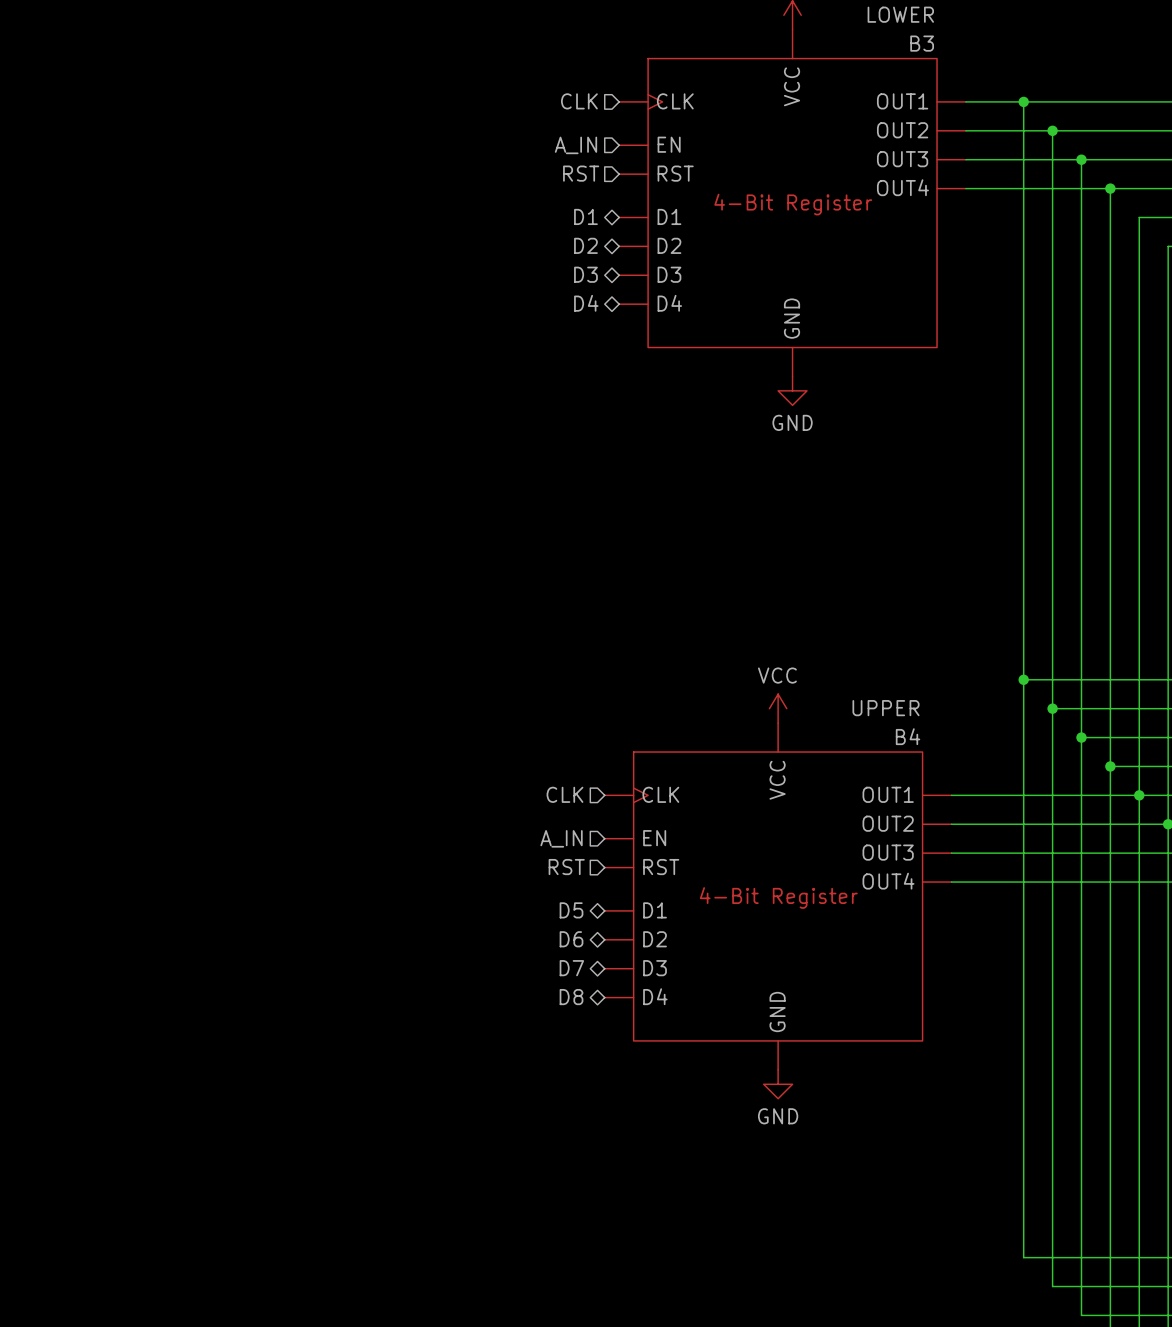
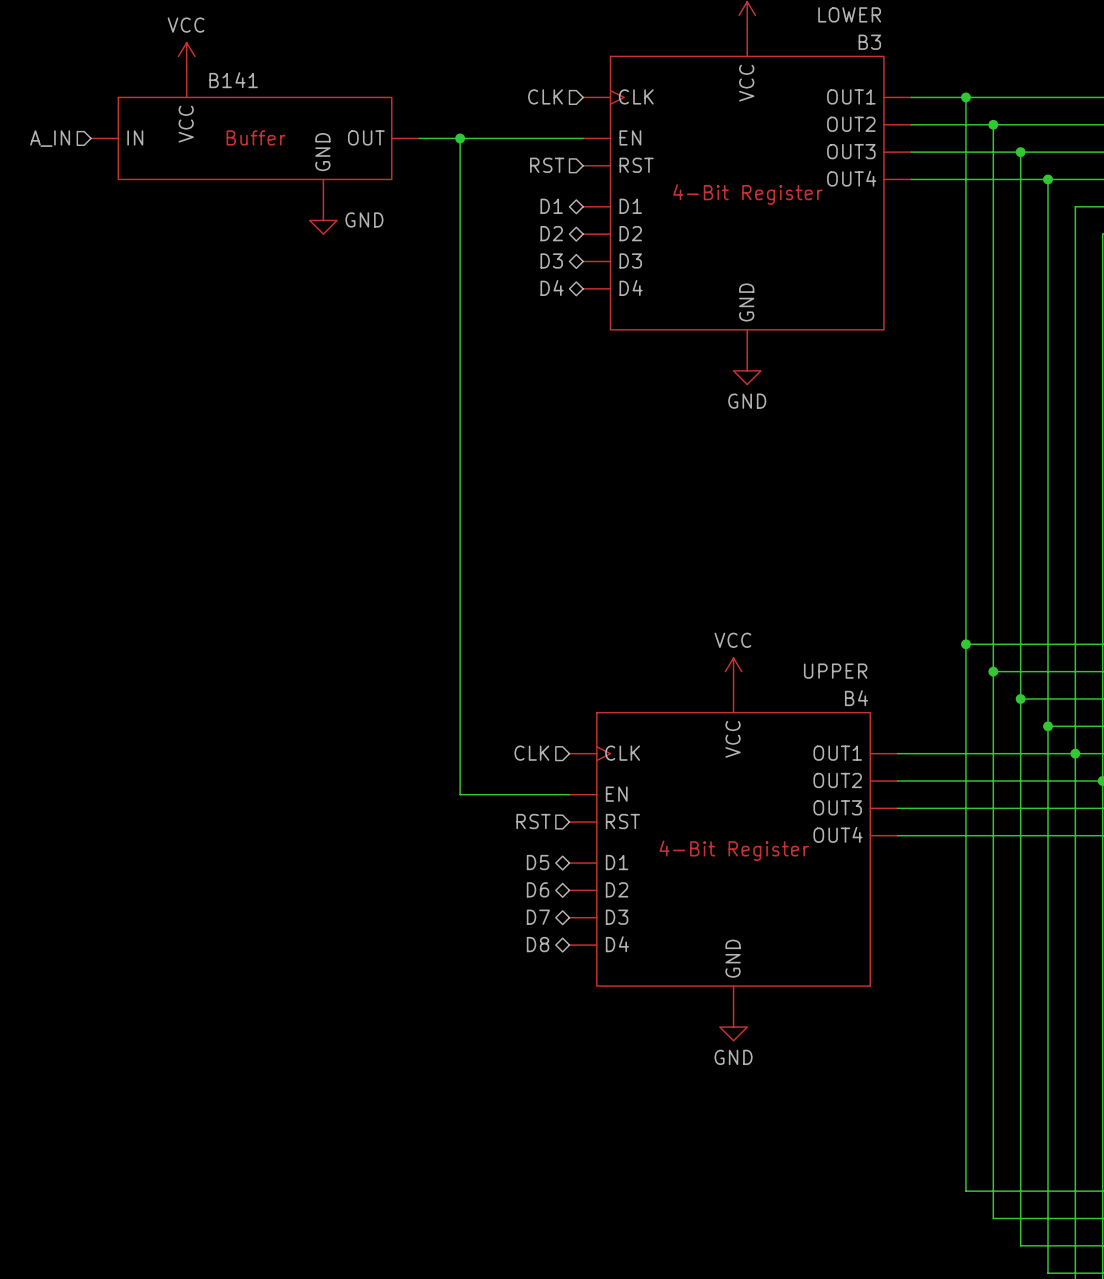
power symbol: none -> VCC (186, 56)
hierarchical label: none -> A_IN (50, 138)
B141: none -> (255, 138)
wire: none -> (419, 138) (583, 138)
wire: none -> (460, 138) (460, 794) (569, 794)
junction: none -> (460, 138)
hierarchical label: A_IN (575, 145) -> none
power symbol: none -> GND (323, 220)
hierarchical label: A_IN (561, 838) -> none

